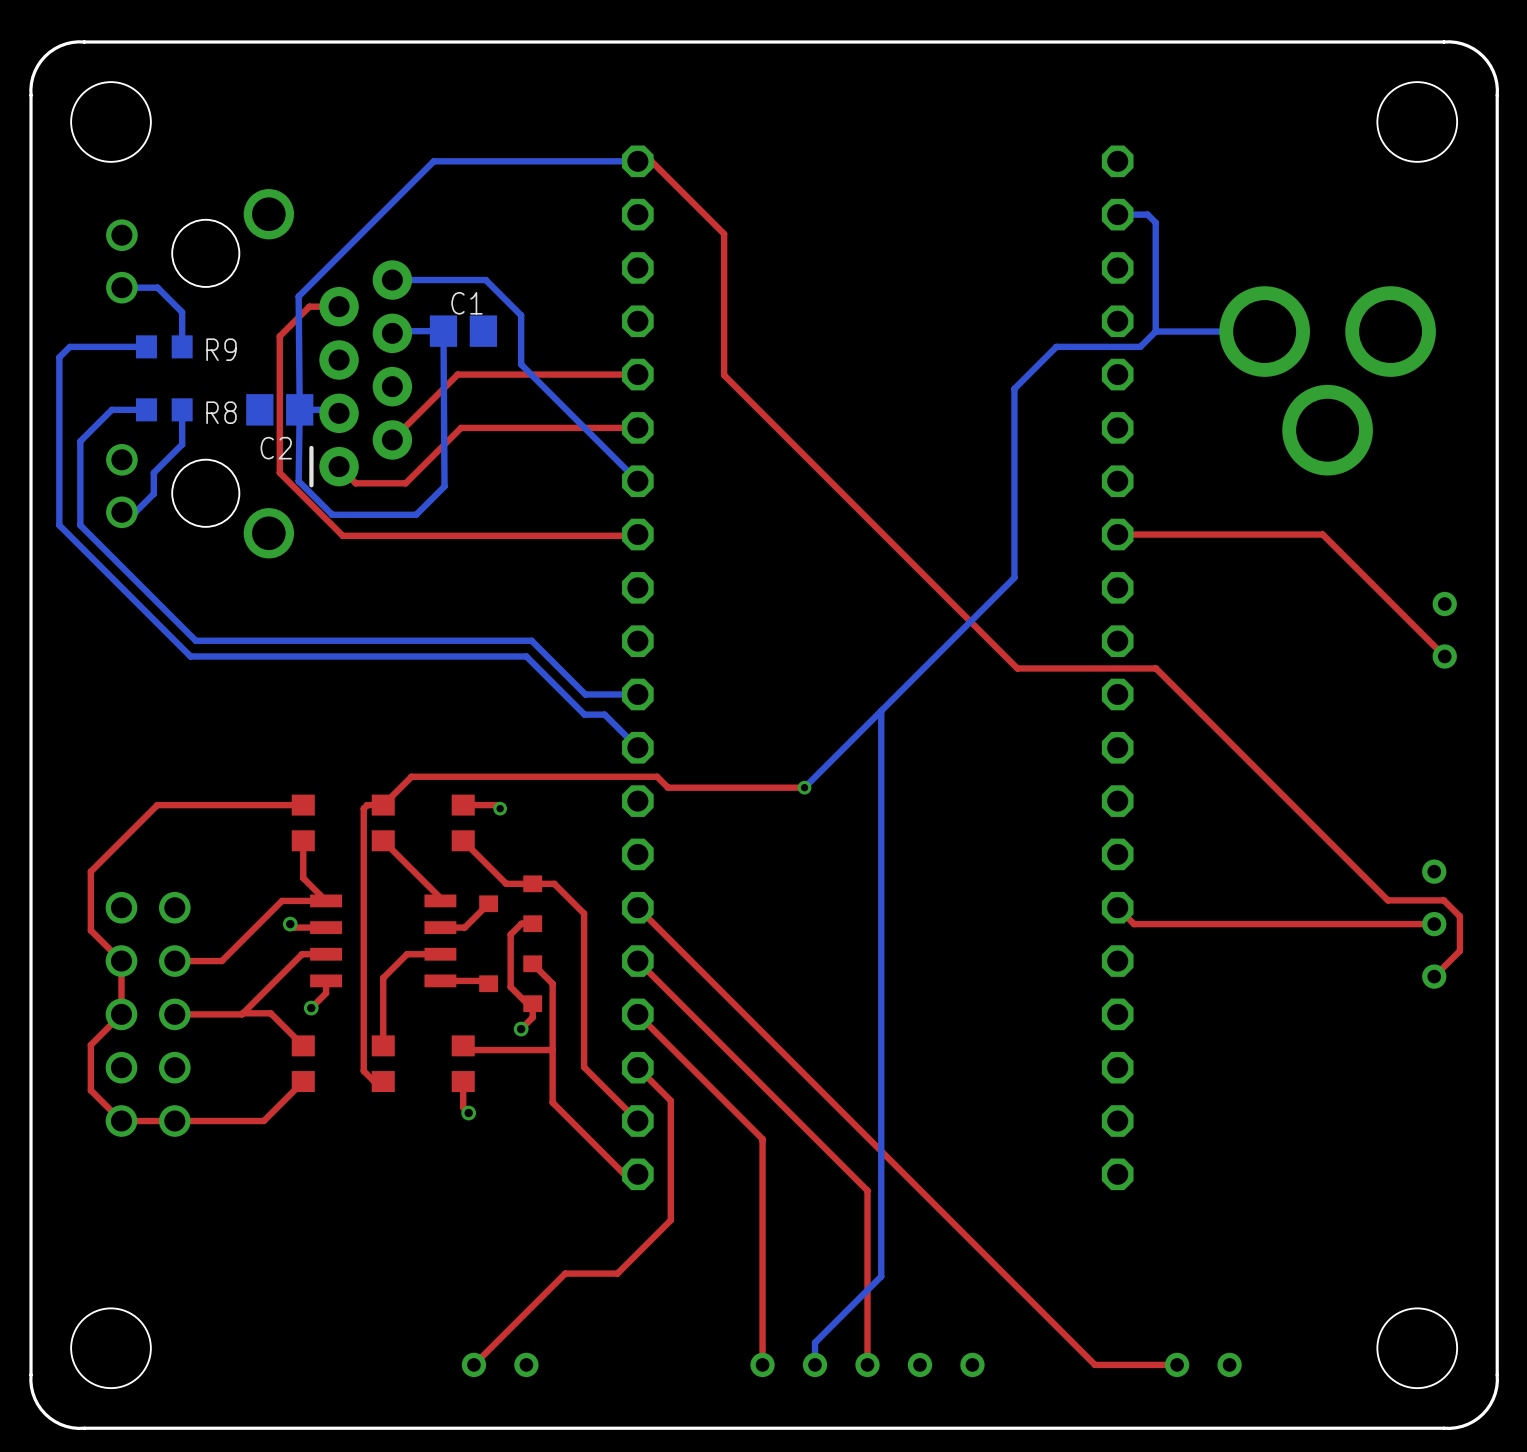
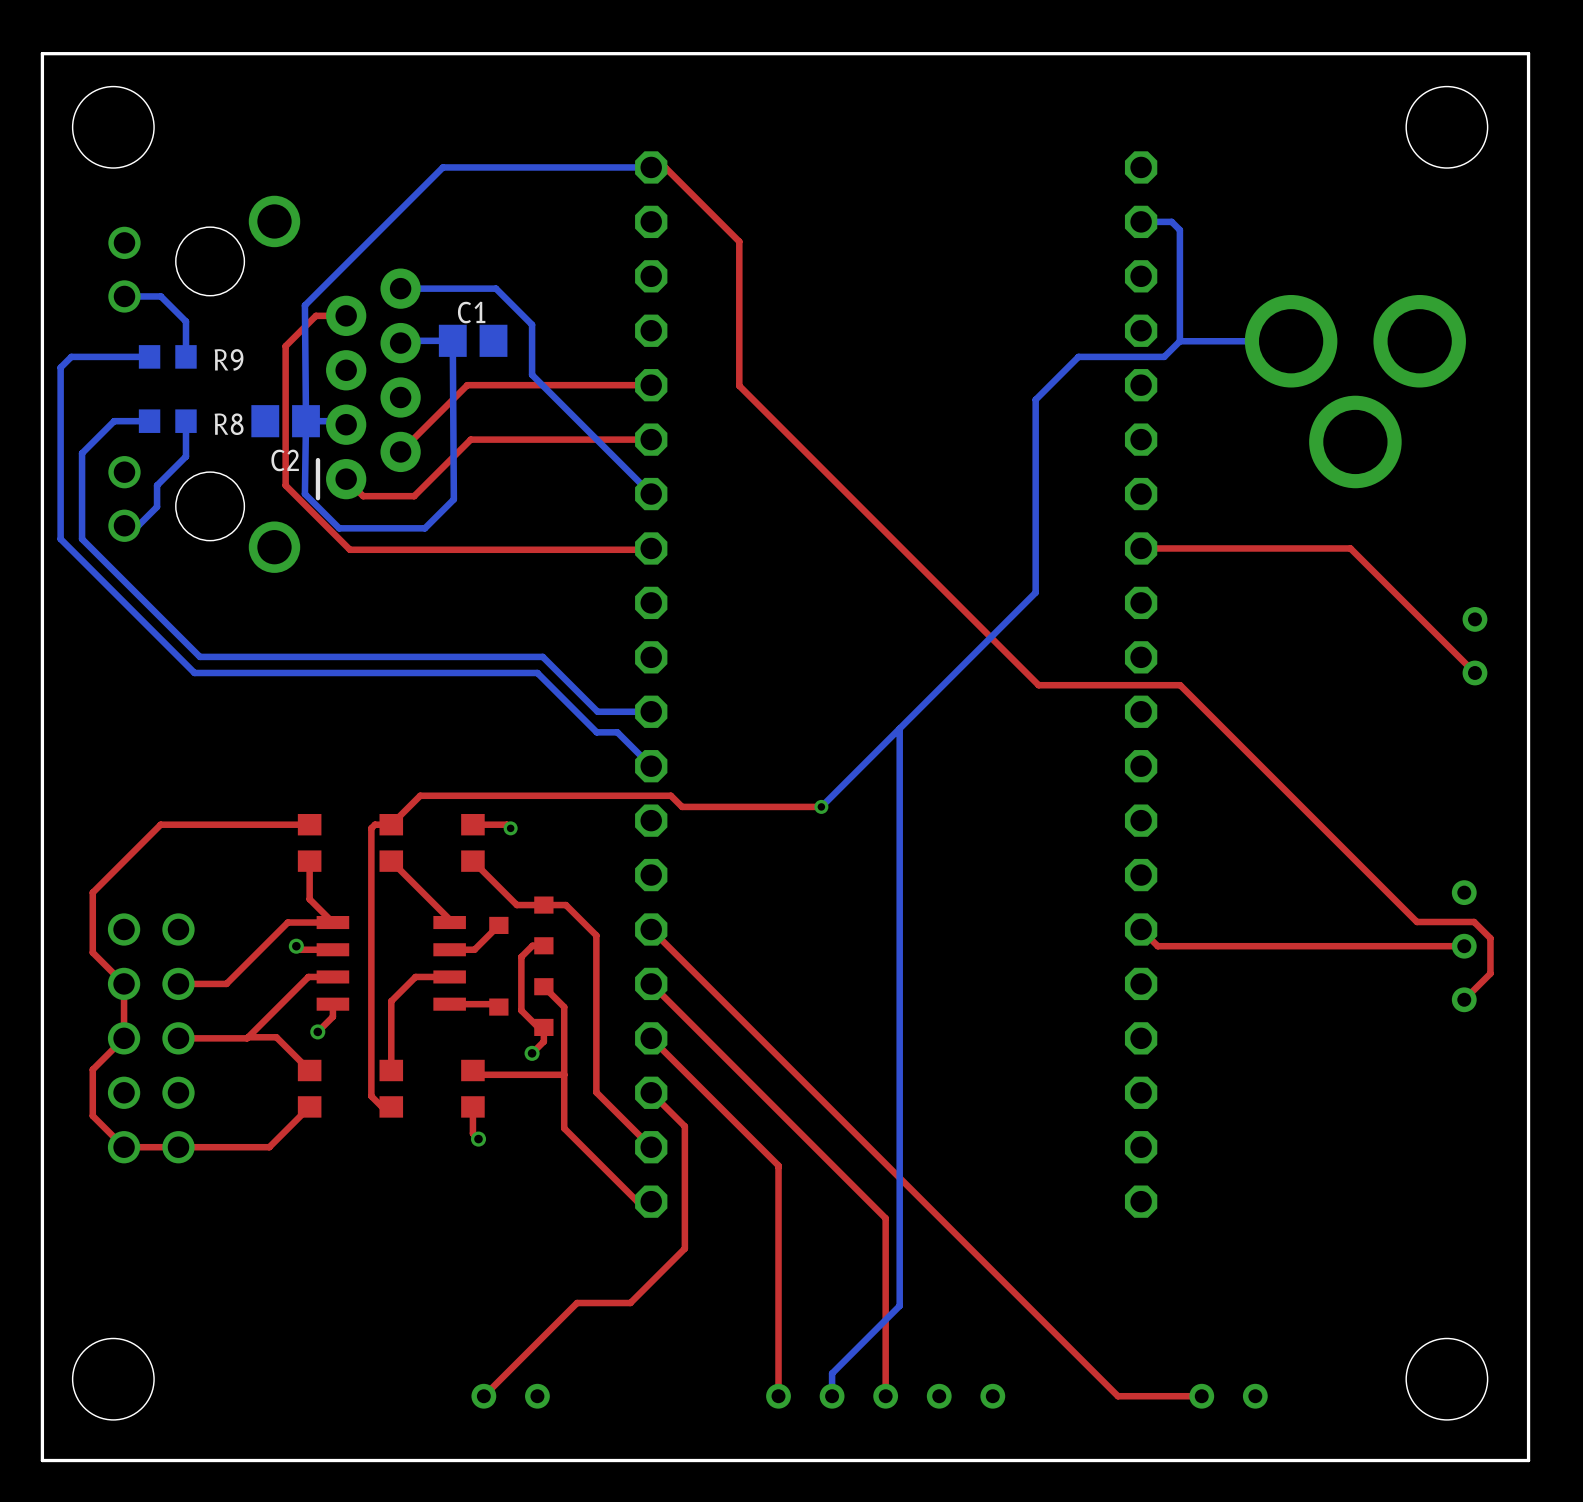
board edge: (1497, 95) (1495, 77) (1487, 60) (1478, 52) (1467, 45) (1450, 41) (78, 41) (60, 45) (45, 56) (34, 71) (30, 89) (30, 1381) (34, 1398) (41, 1409) (49, 1418) (60, 1424) (78, 1428) (1450, 1428) (1467, 1424) (1478, 1418) (1487, 1409) (1495, 1393) (1497, 1374) -> (1528, 100) (1528, 53) (42, 53) (42, 1460) (1528, 1460) (1528, 1406)

